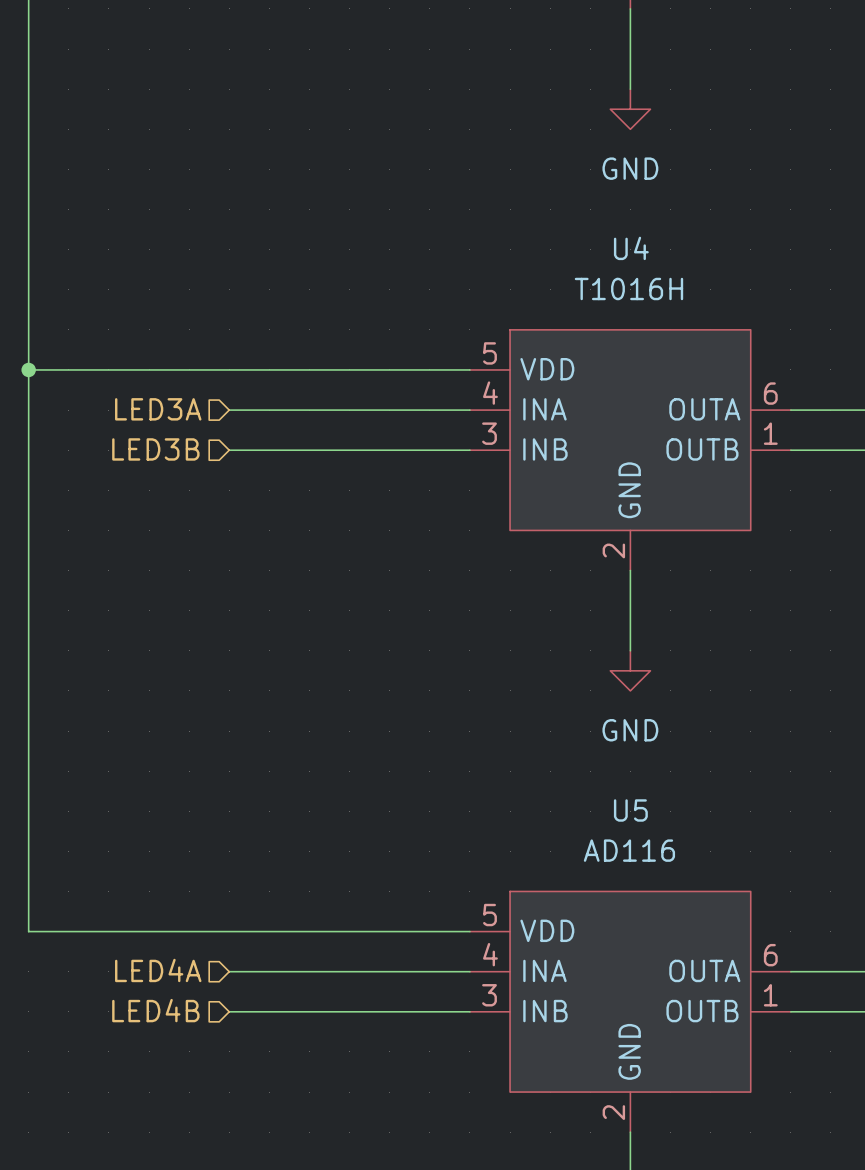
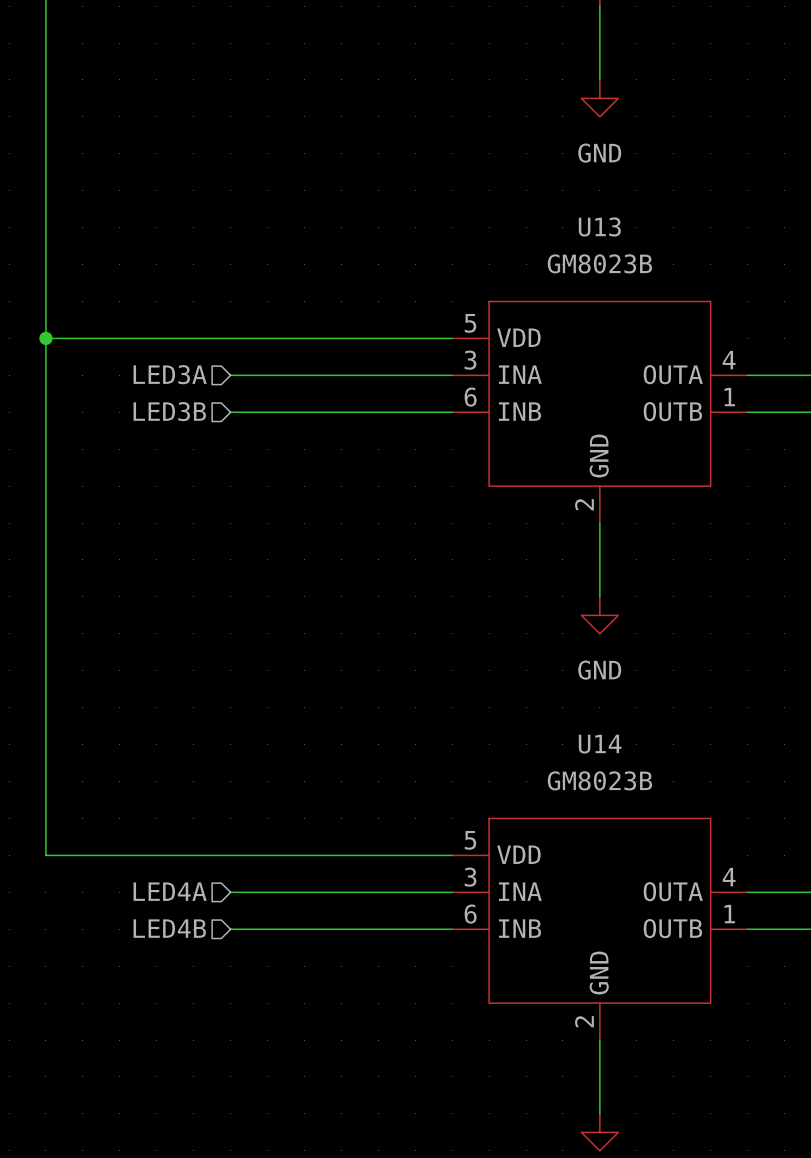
U4 name: U4 (631, 248) -> U13 (599, 226)
U4 value: T1016H (628, 288) -> GM8023B (599, 263)
U4 pin number: 4 (490, 393) -> 3 (470, 360)
U4 pin number: 6 (770, 393) -> 4 (729, 360)
U4 pin number: 3 (489, 433) -> 6 (470, 397)
U5 name: U5 (630, 810) -> U14 (600, 744)
U5 value: AD116 (629, 850) -> GM8023B (599, 780)
U5 pin number: 4 (490, 954) -> 3 (470, 877)
U5 pin number: 6 (770, 955) -> 4 (729, 877)
U5 pin number: 3 (489, 995) -> 6 (470, 914)

